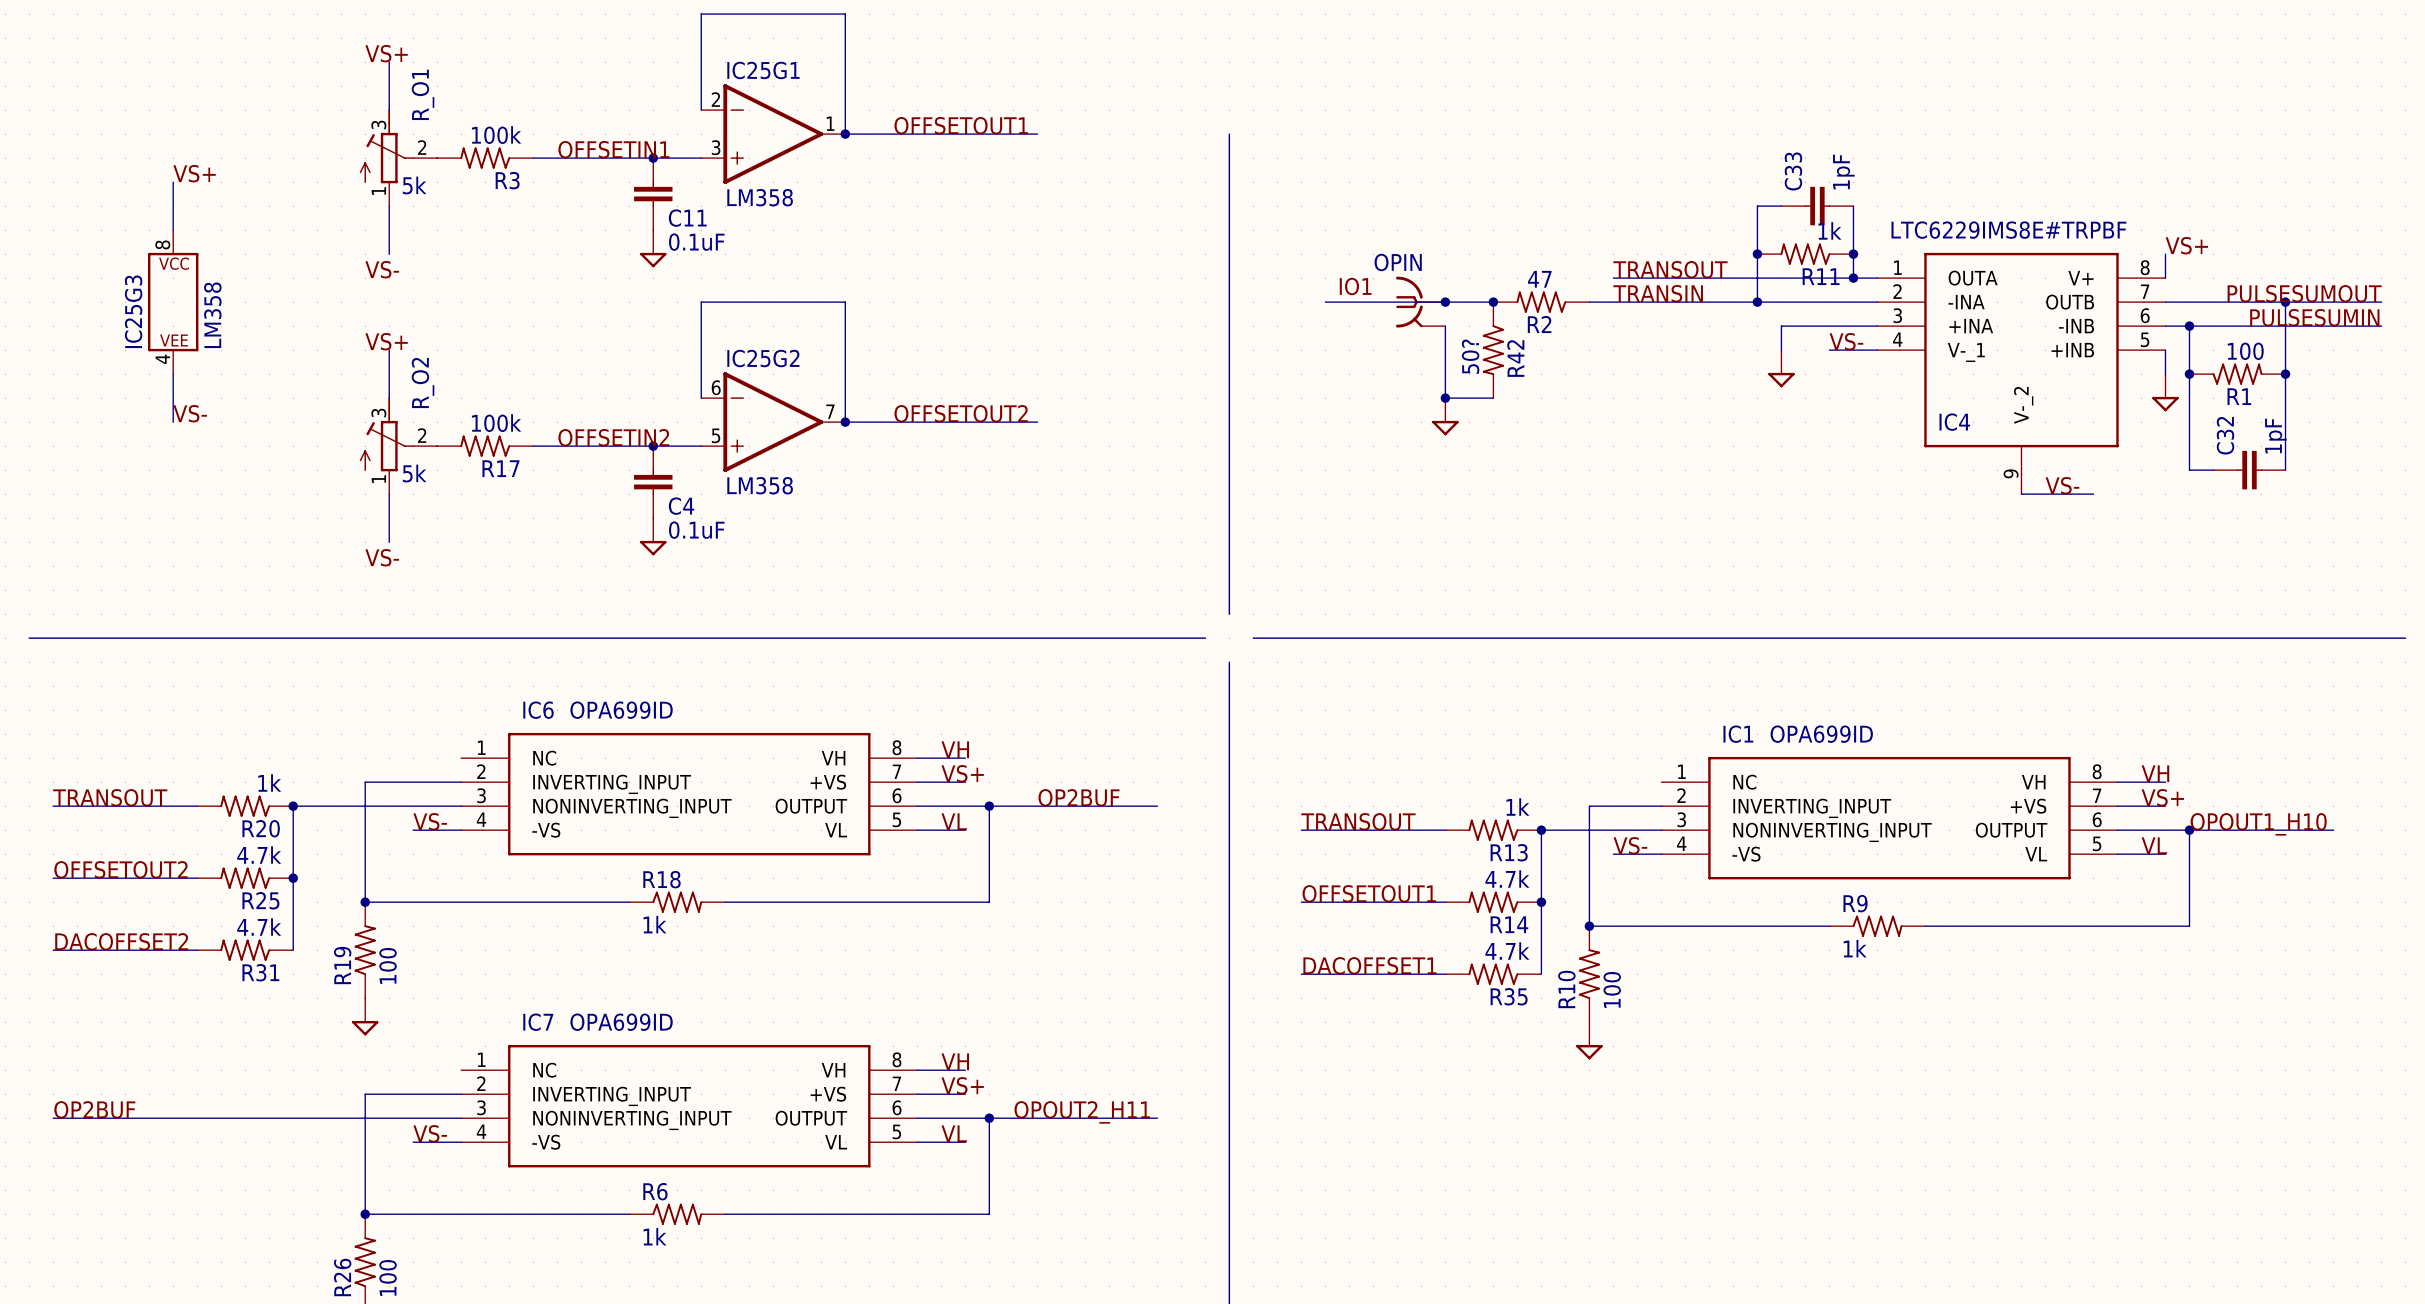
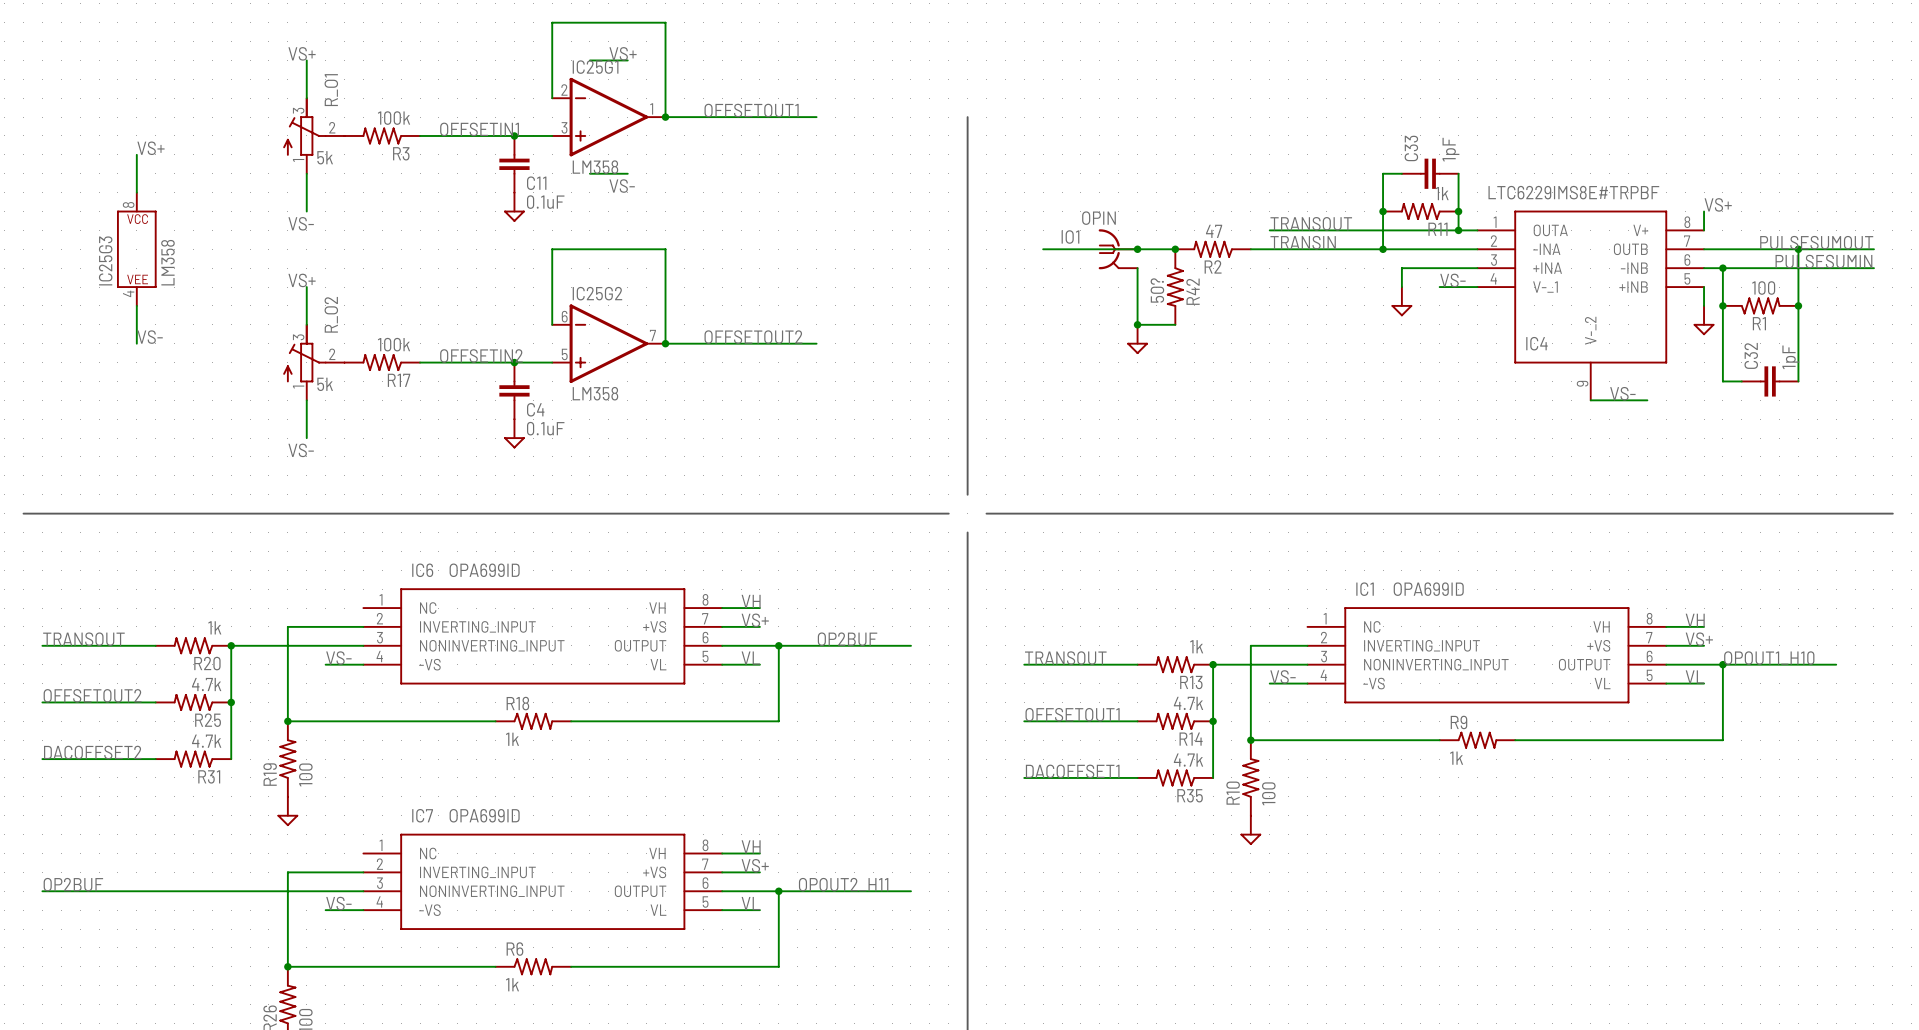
label: none -> VS+ (623, 53)
wire: none -> (589, 60) (627, 60)
wire: none -> (589, 173) (627, 173)
label: none -> VS- (622, 186)

